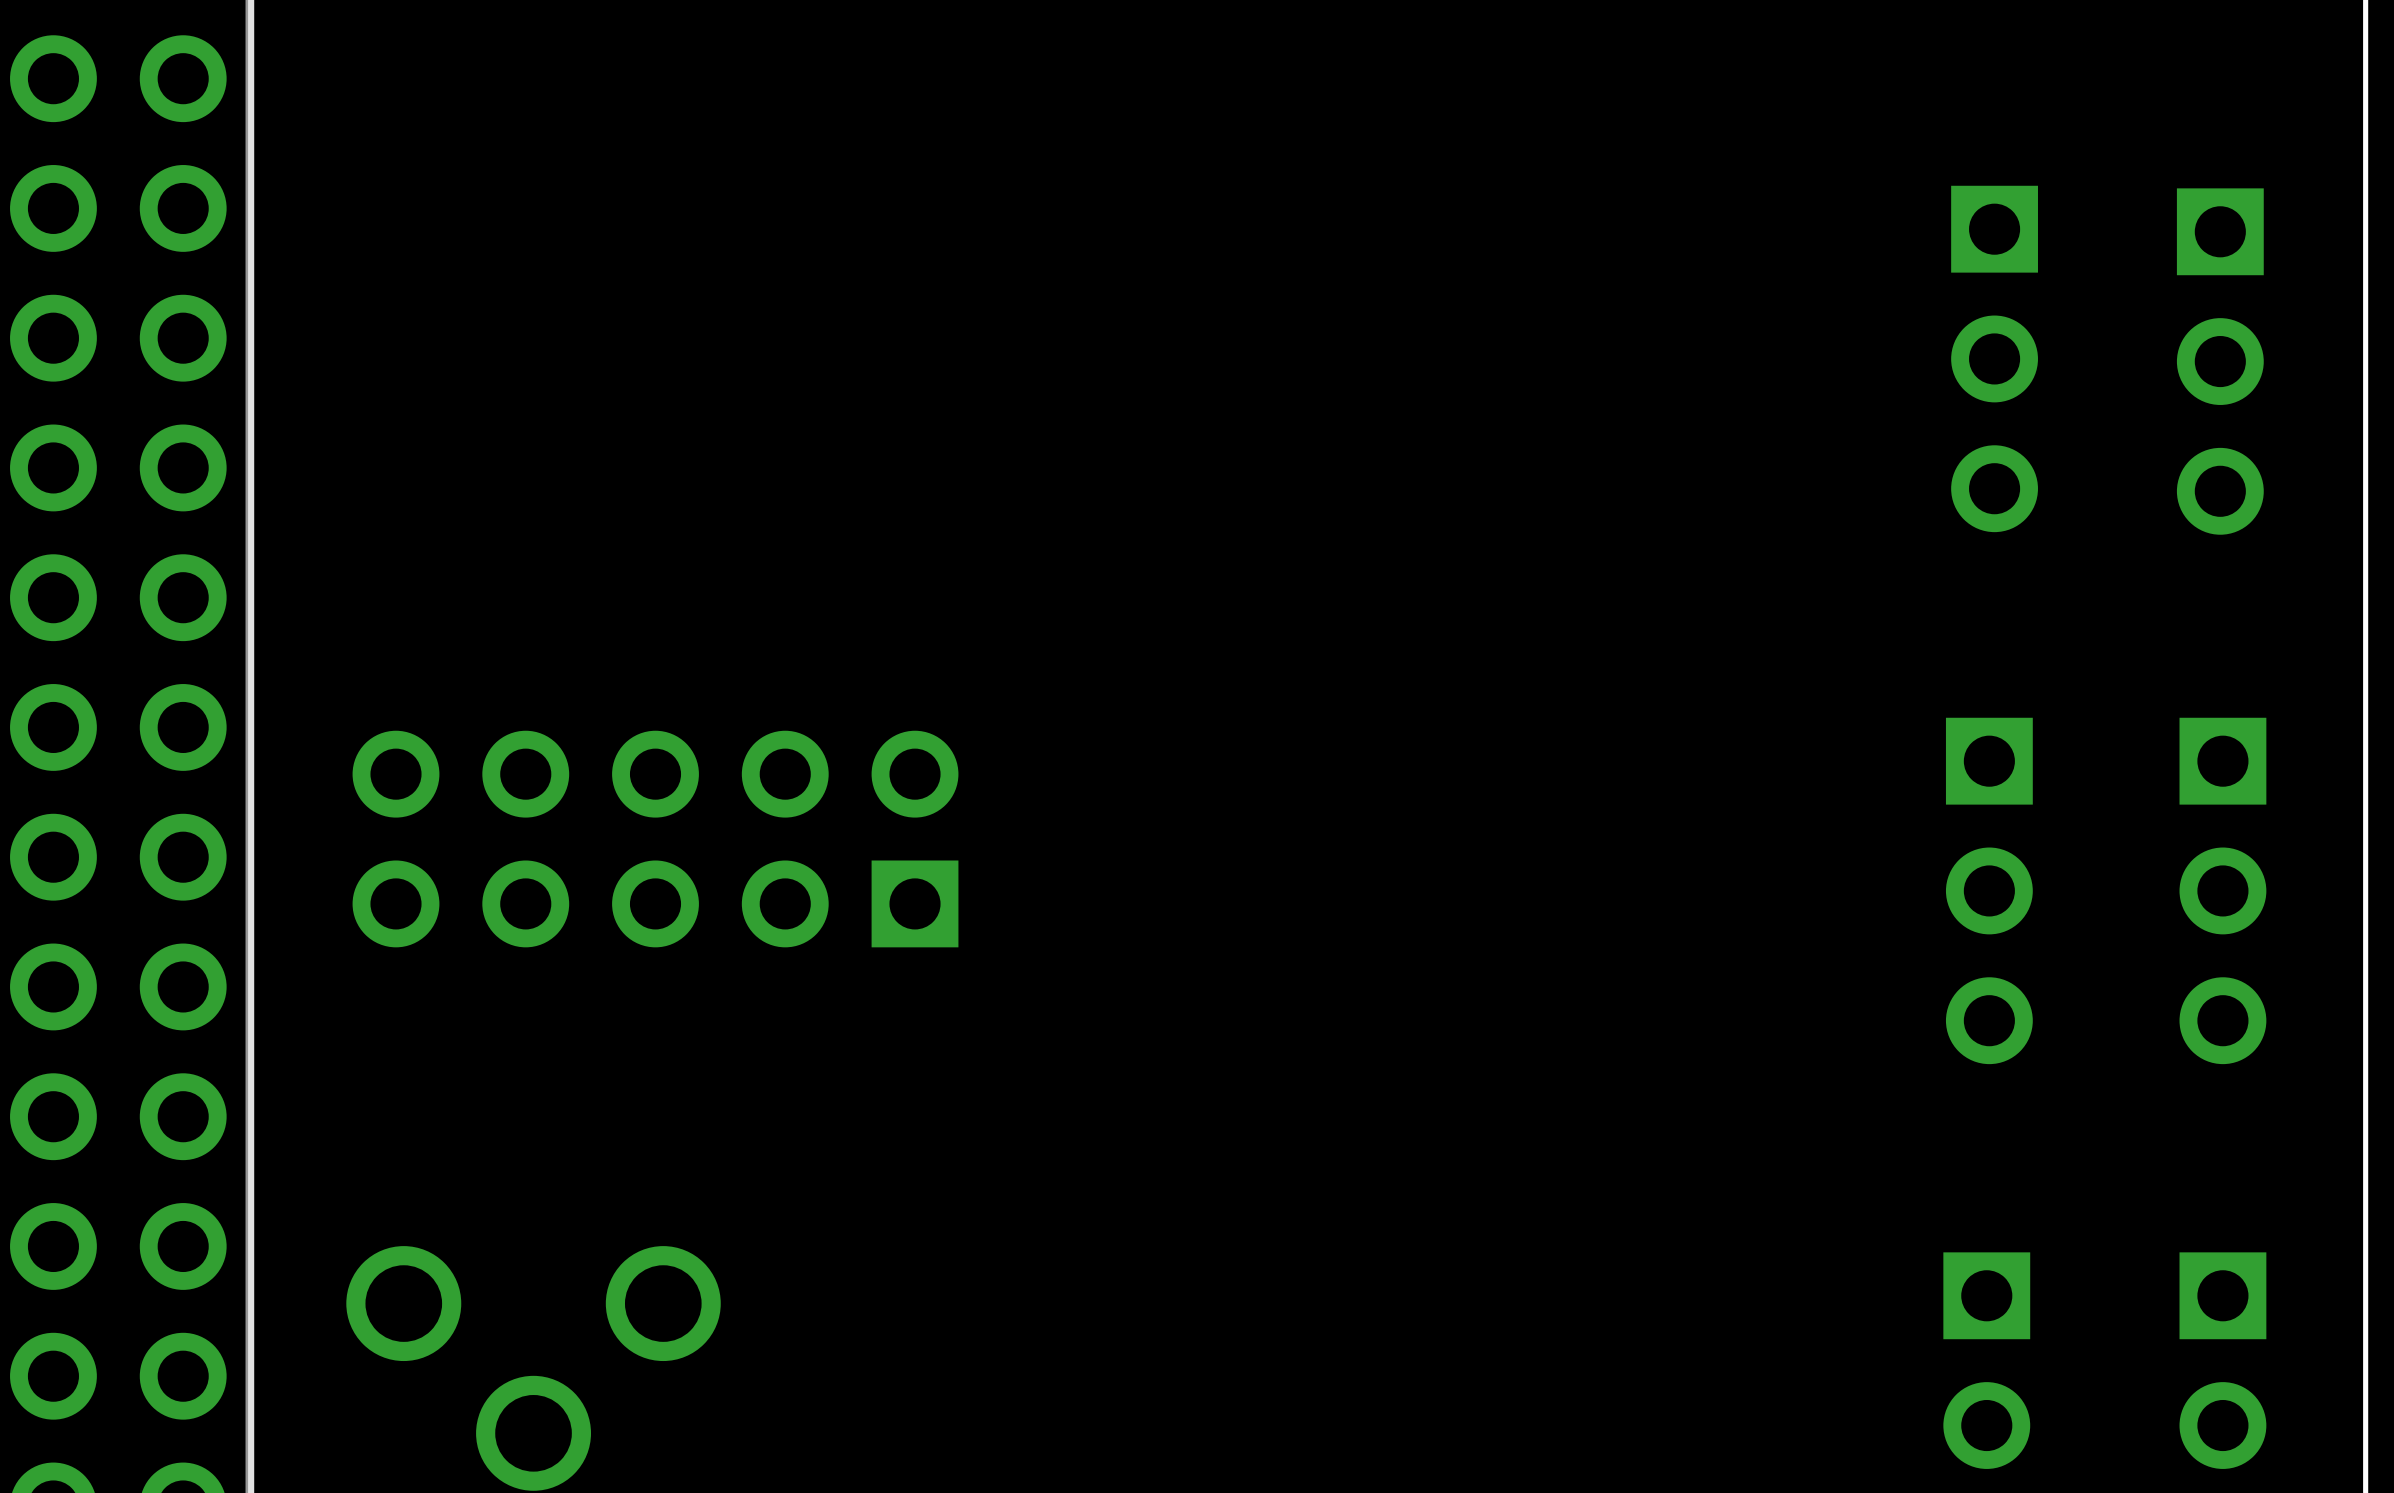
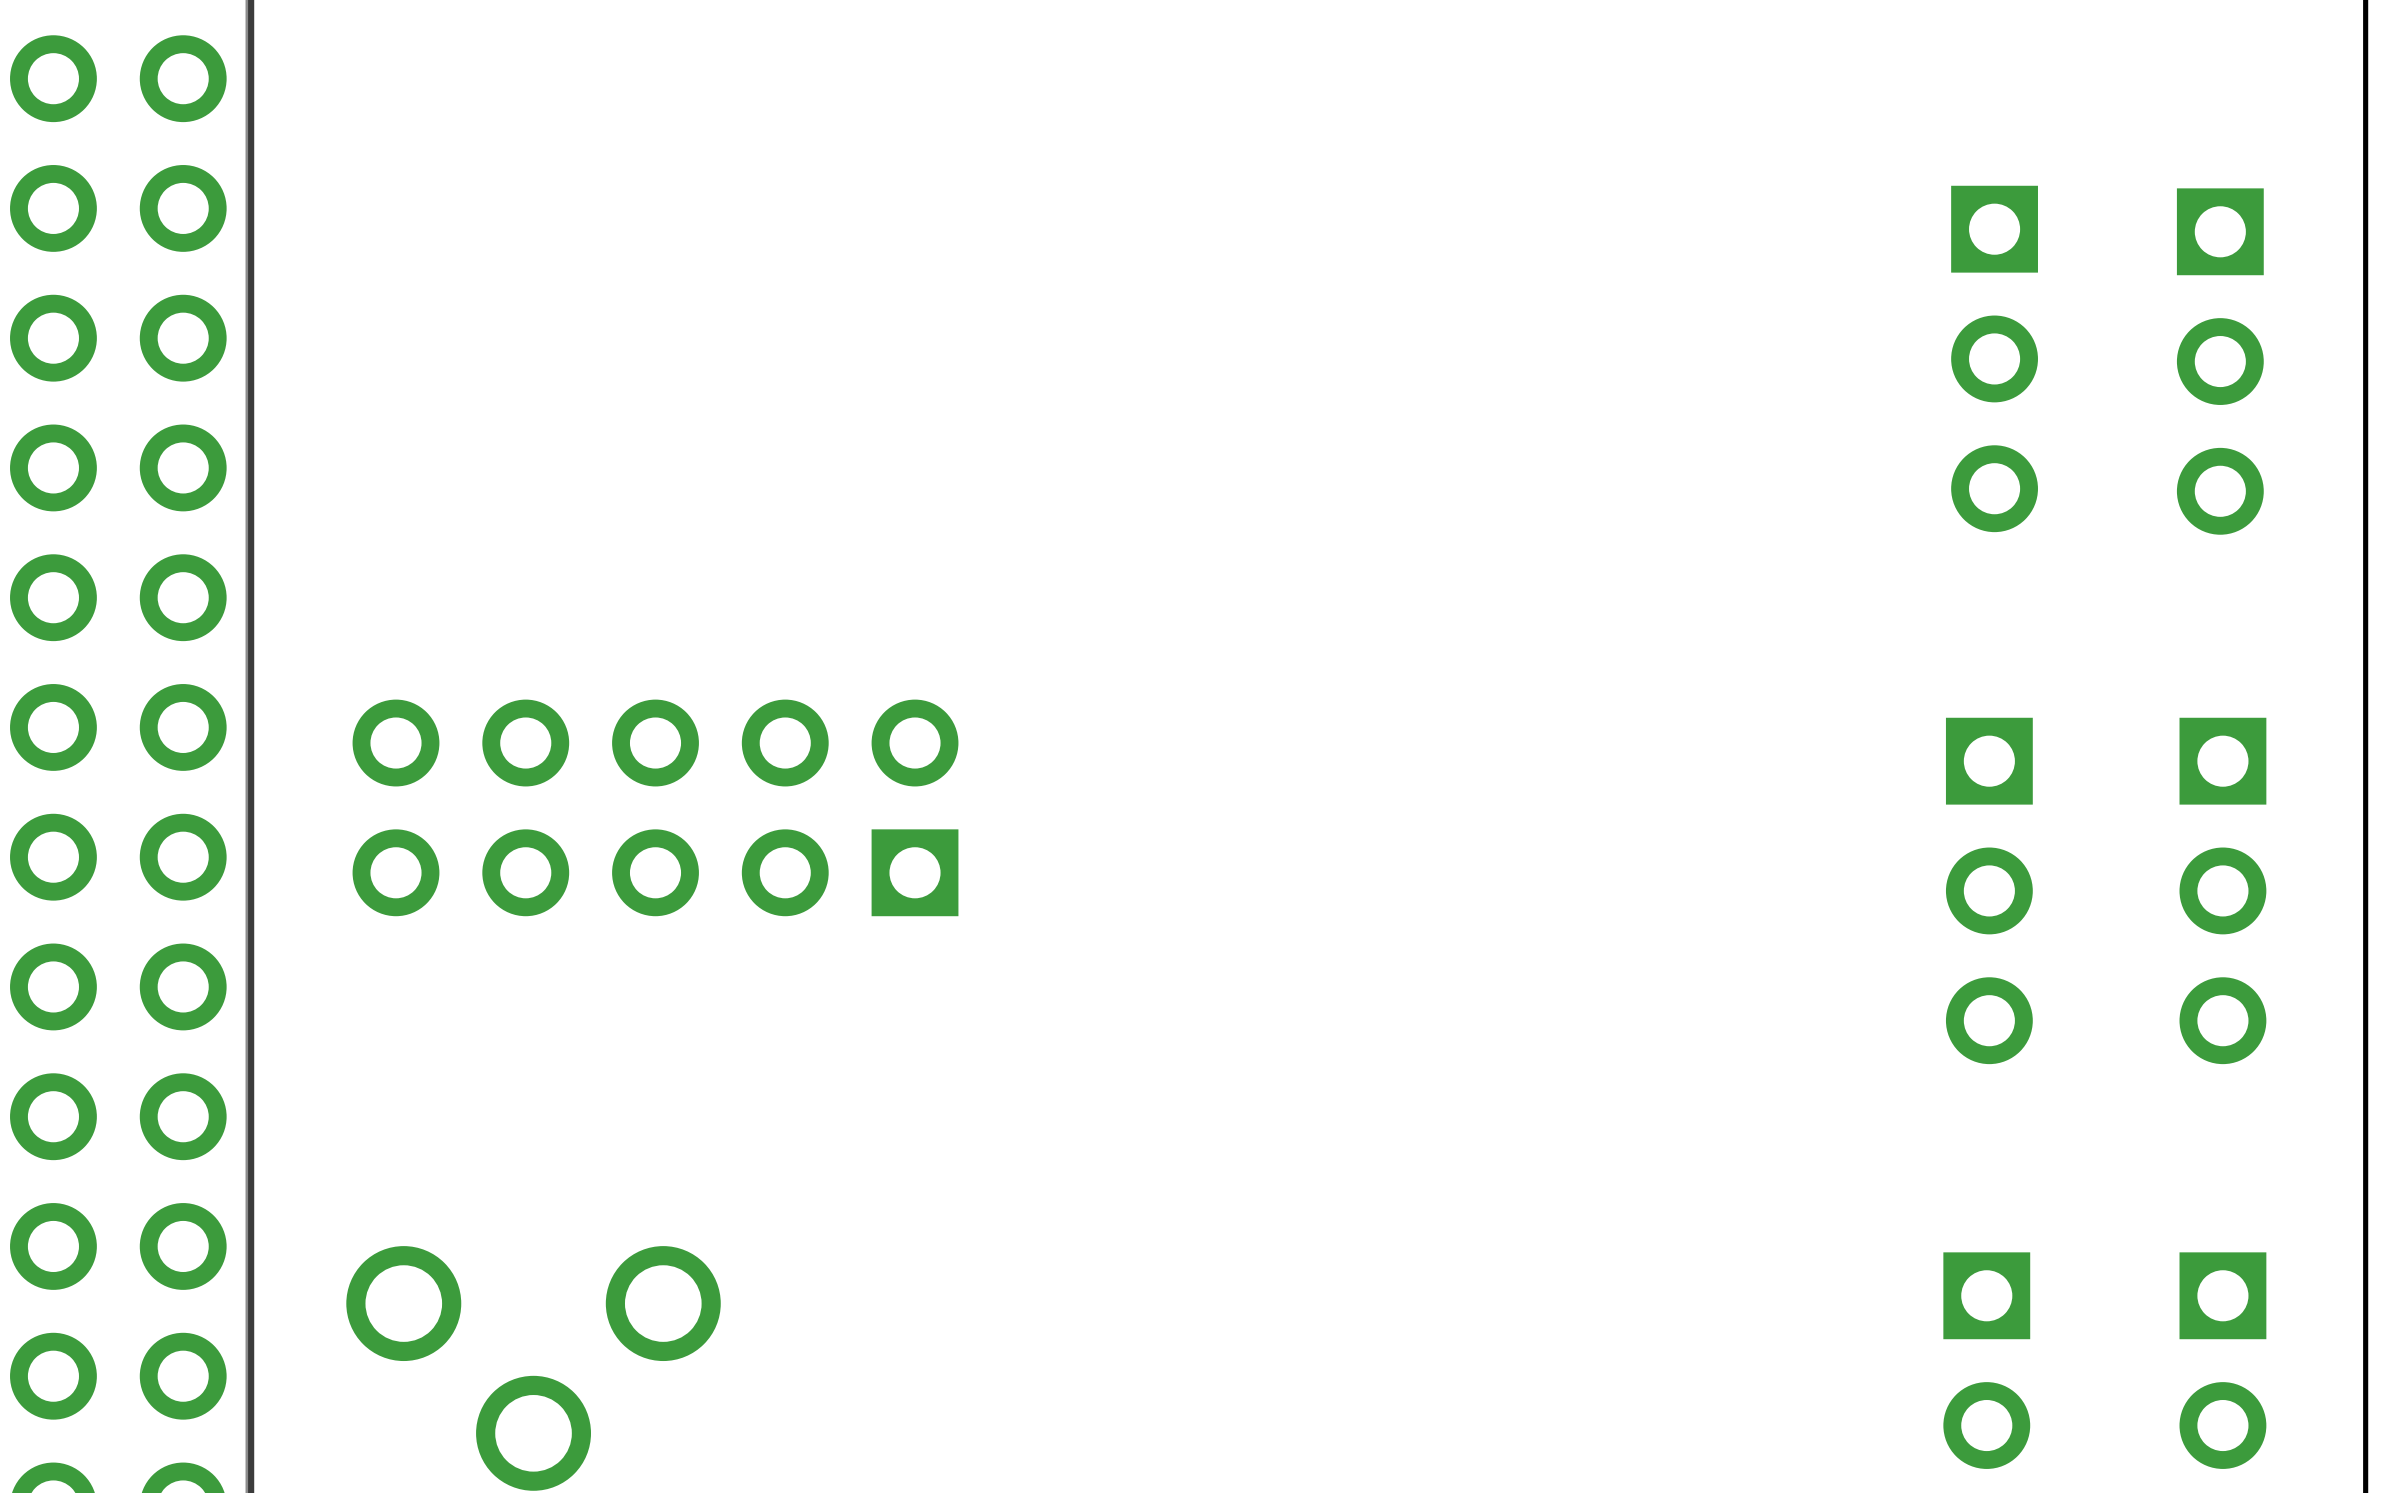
part position: (655, 839) -> (655, 807)

